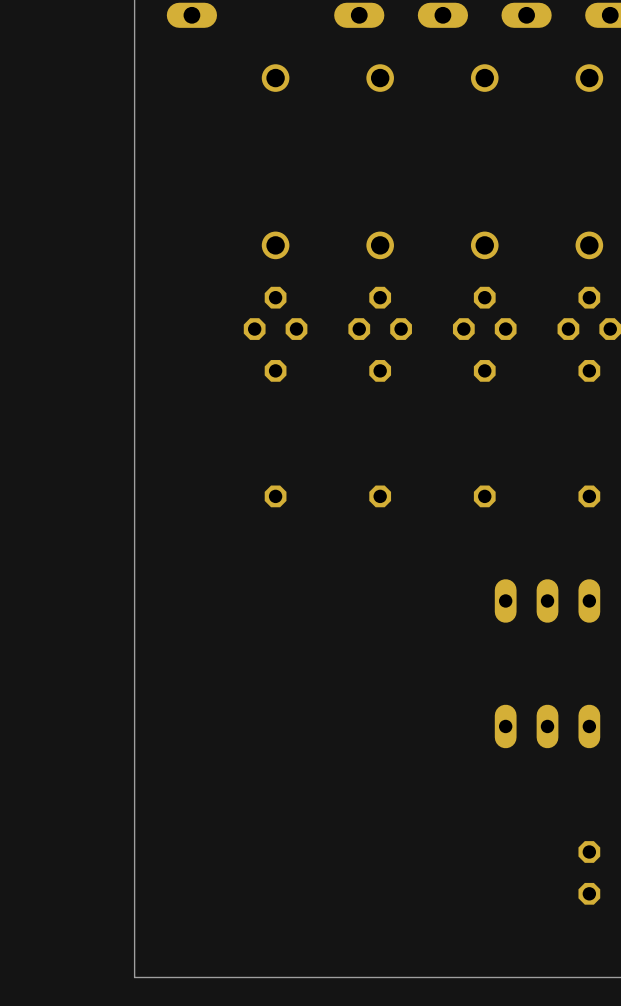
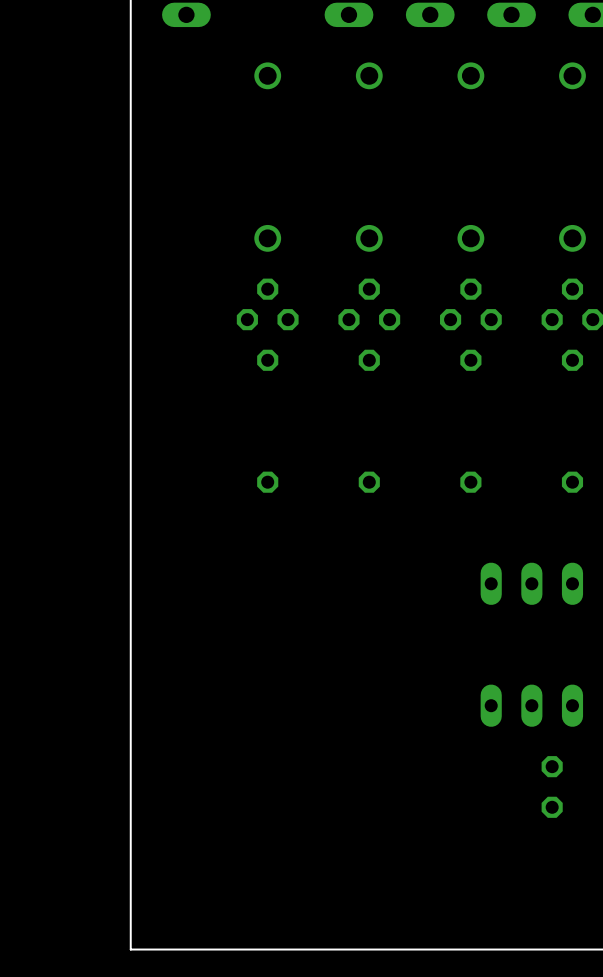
part position: (589, 872) -> (552, 786)

